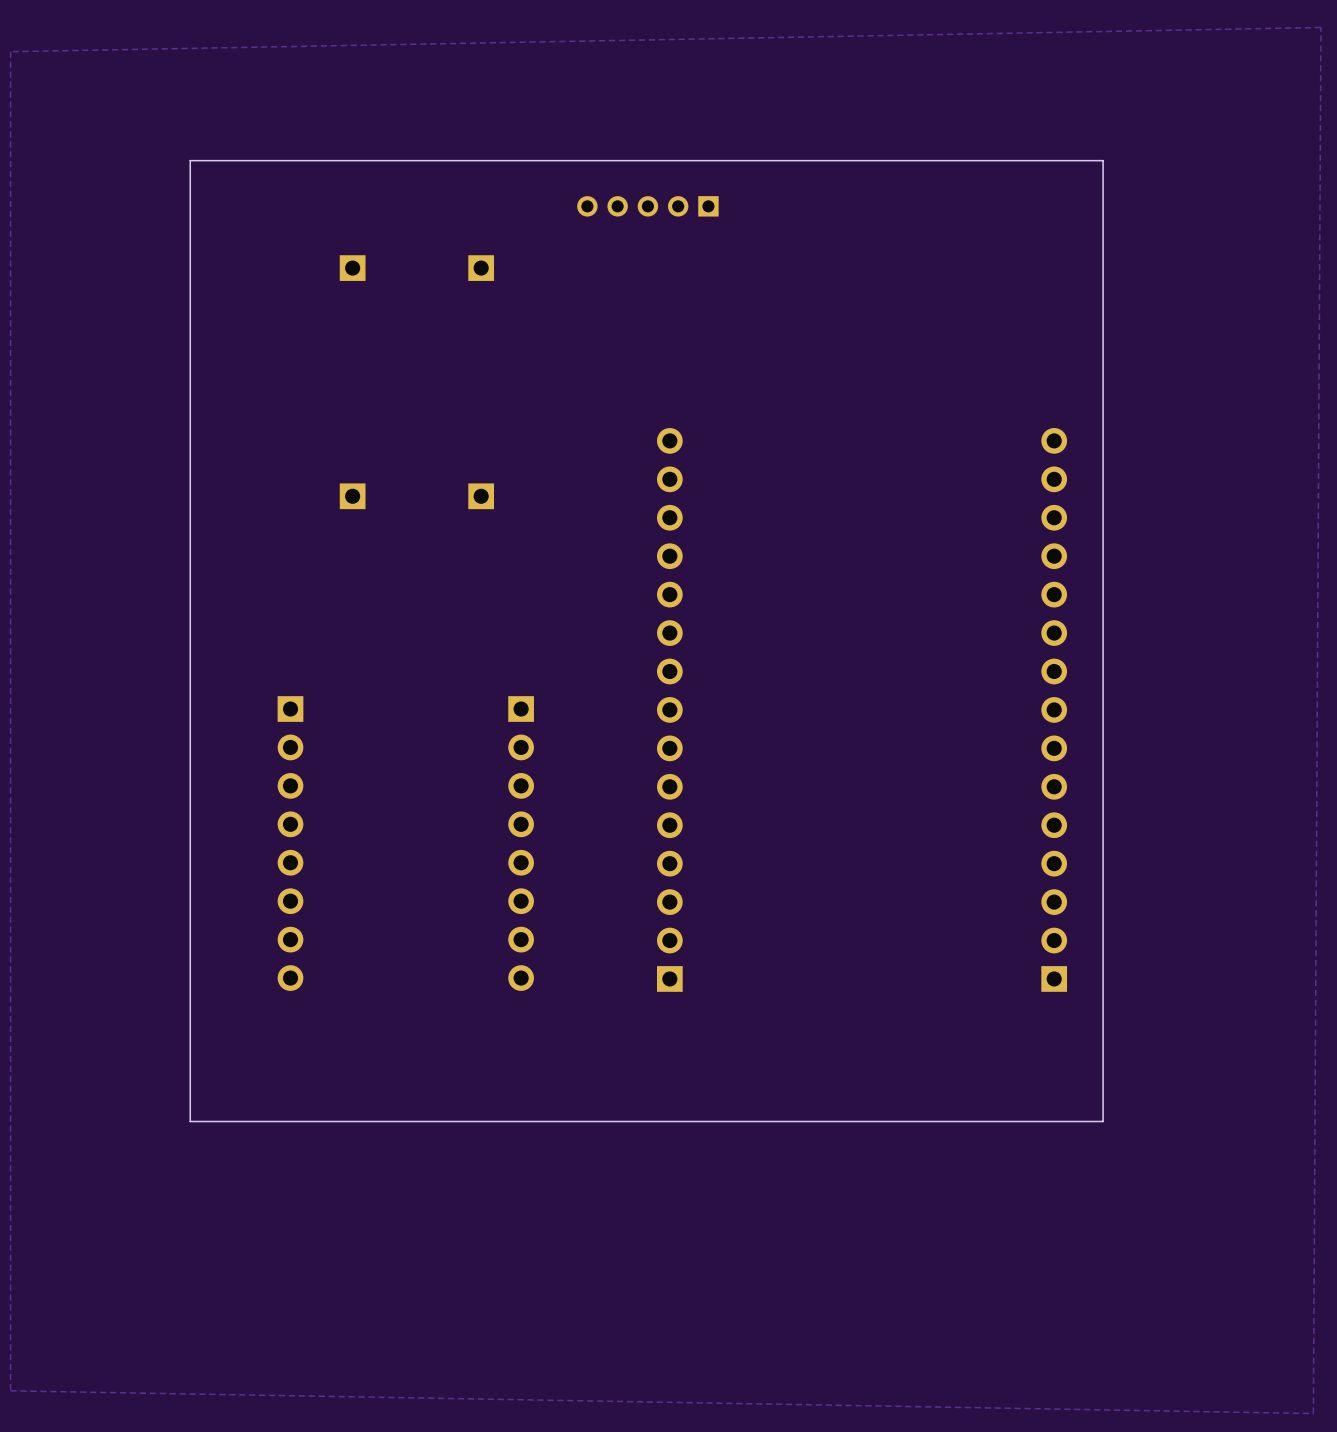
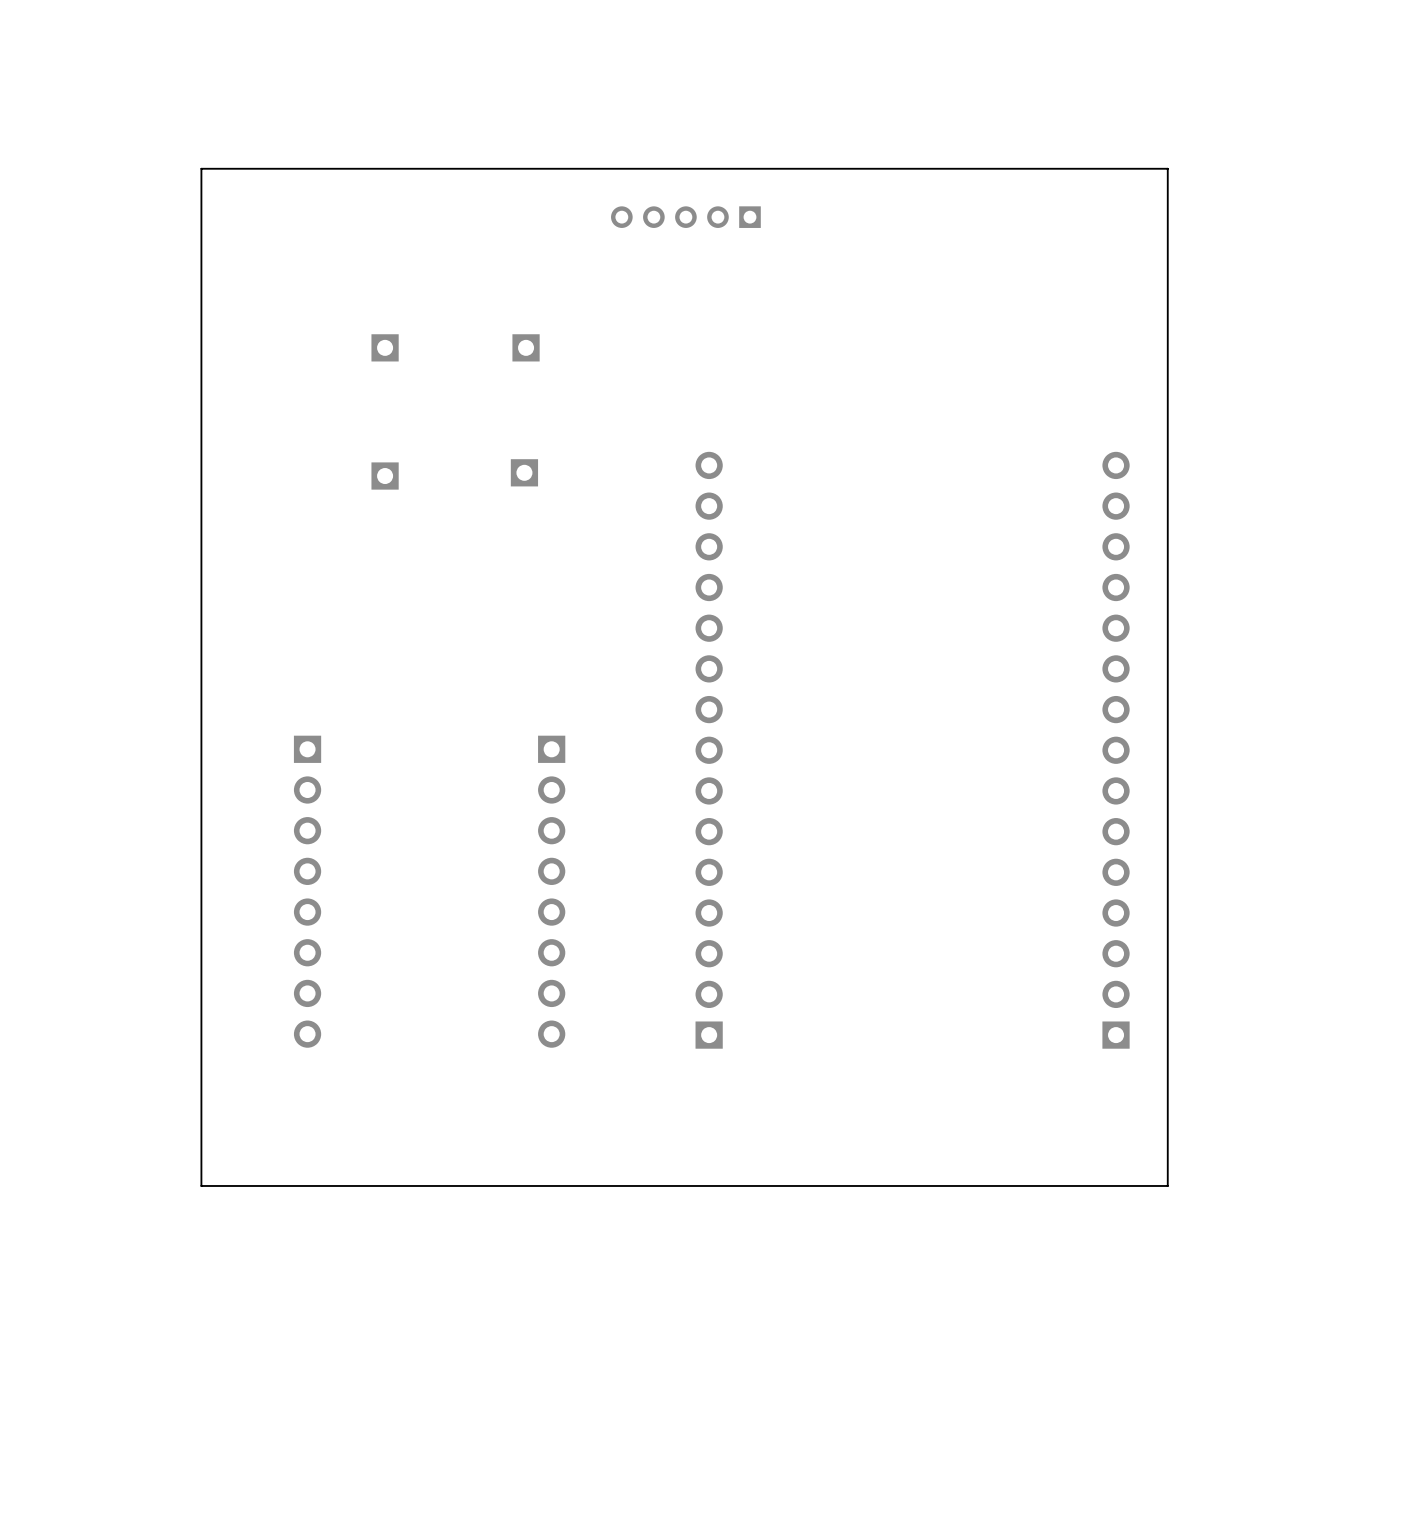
zone outline: (1320, 27) (10, 51) (10, 1390) (1313, 1413) (1320, 27) -> none
part position: (352, 268) -> (385, 347)
part position: (481, 268) -> (526, 347)
part position: (352, 496) -> (385, 476)
part position: (481, 496) -> (524, 472)

